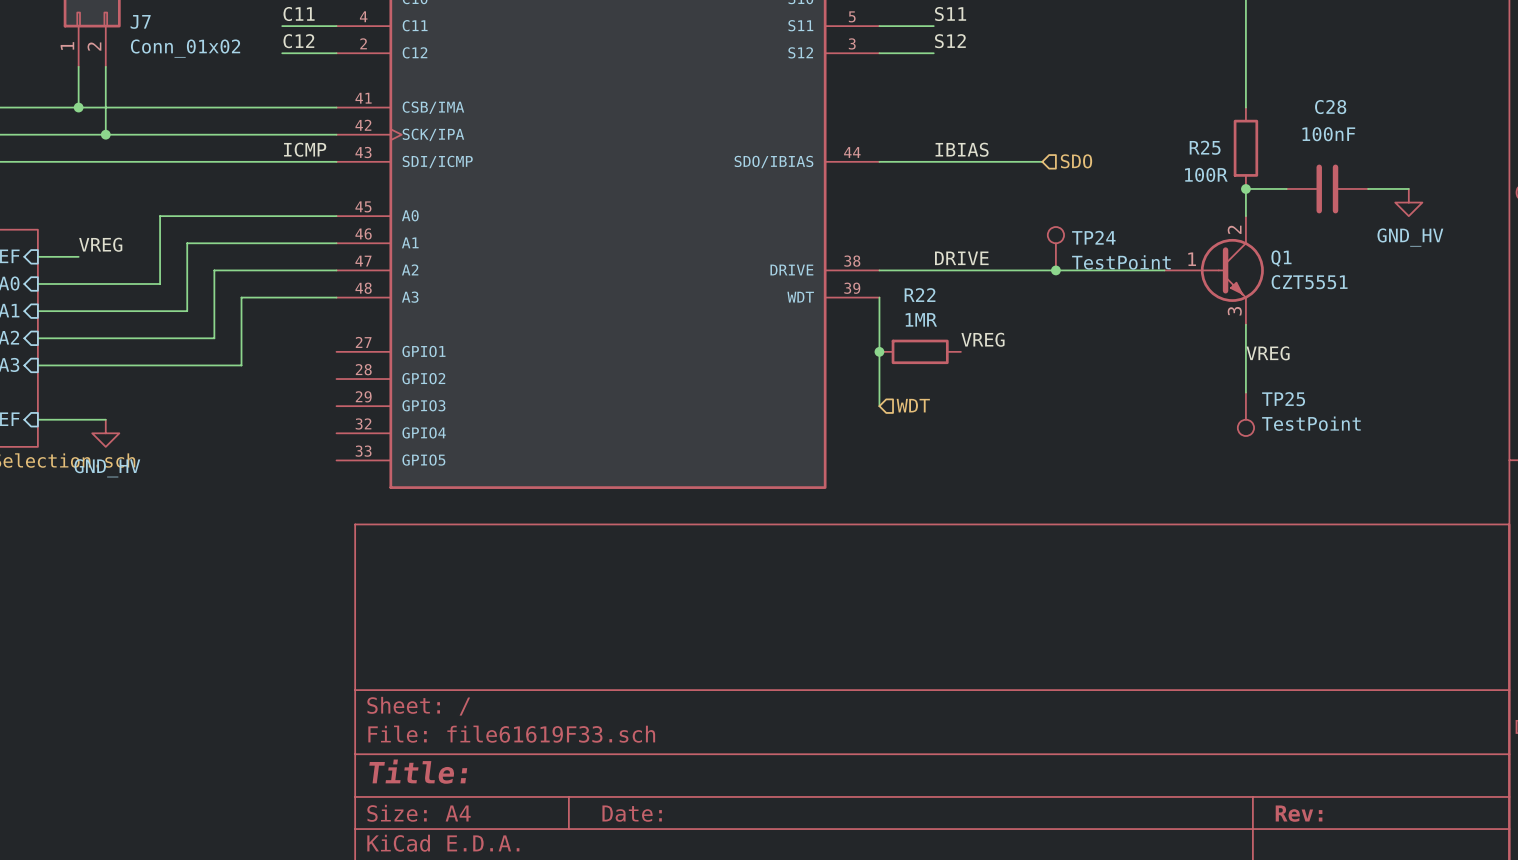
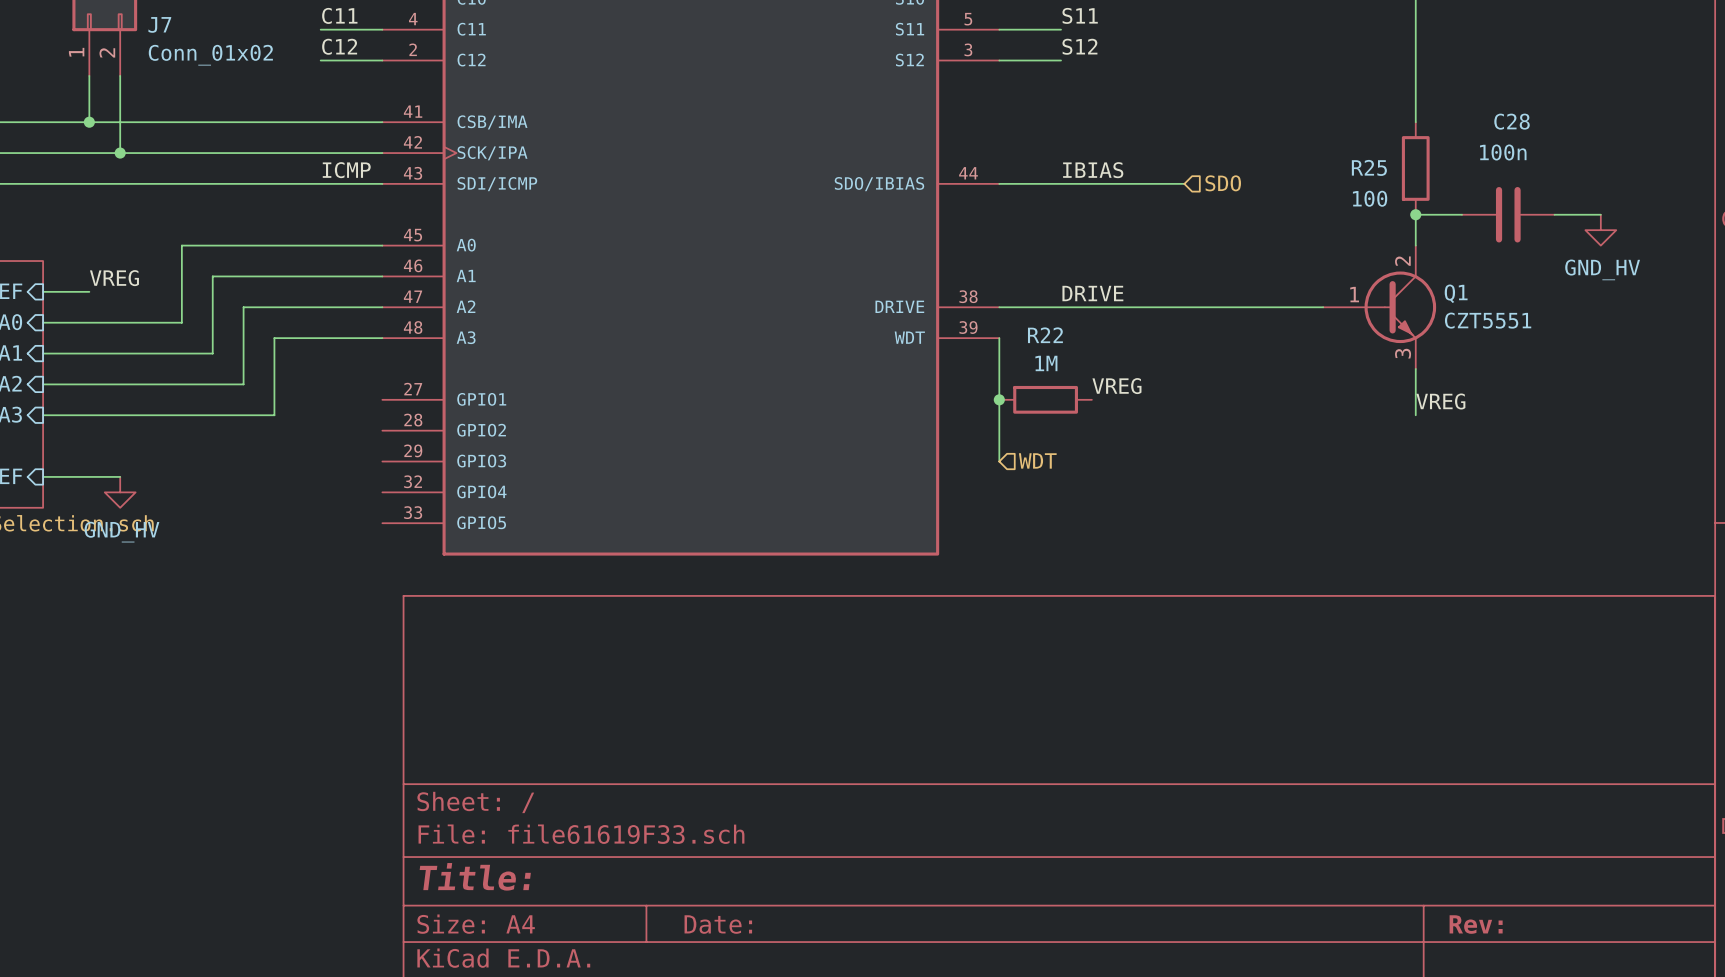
C28 value: 100nF (1328, 134) -> 100n (1503, 152)
R25 value: 100R (1206, 174) -> 100 (1370, 198)
TP24: TestPoint (1055, 248) -> none
junction: (1055, 270) -> none
R22 value: 1MR (921, 319) -> 1M (1046, 363)
wire: (1245, 365) (1245, 392) -> none
TP25: TestPoint (1245, 414) -> none

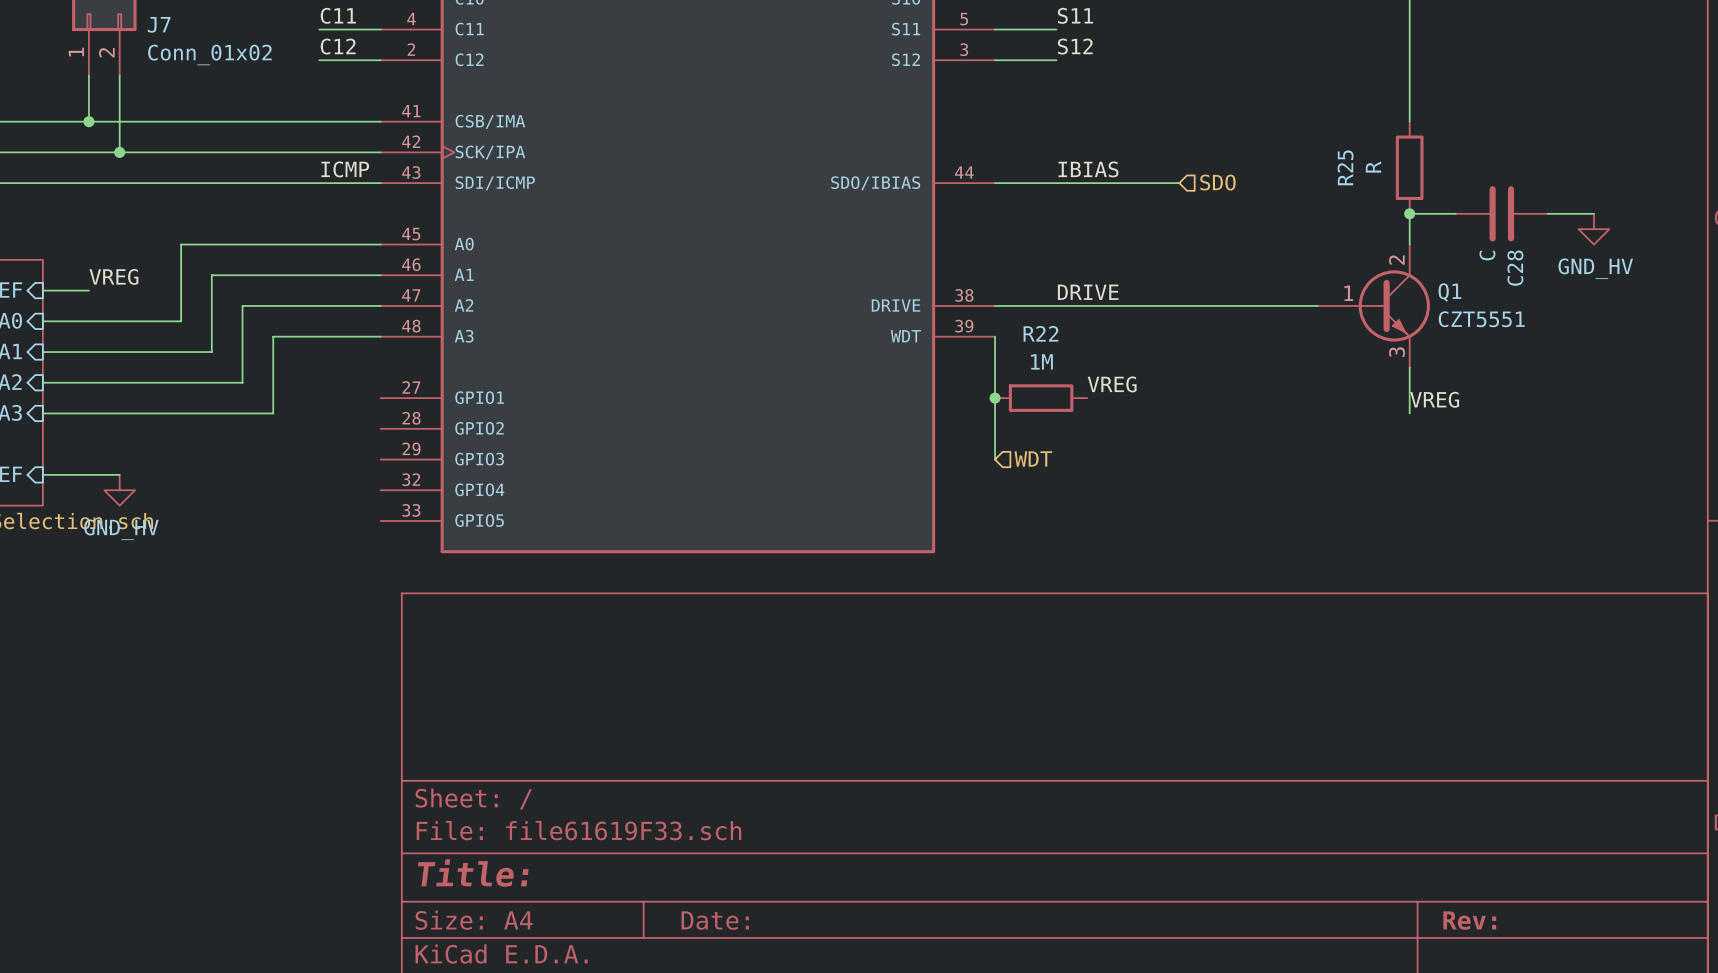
C28 name rotation: 0° (1512, 121) -> 90° counterclockwise (1515, 268)
C28 name position: C28 (1512, 121) -> C28 (1515, 268)
C28 value: 100n (1503, 152) -> C (1487, 255)
R25 name rotation: 0° (1369, 167) -> 90° counterclockwise (1345, 167)
R25 value: 100 (1370, 198) -> R (1373, 167)

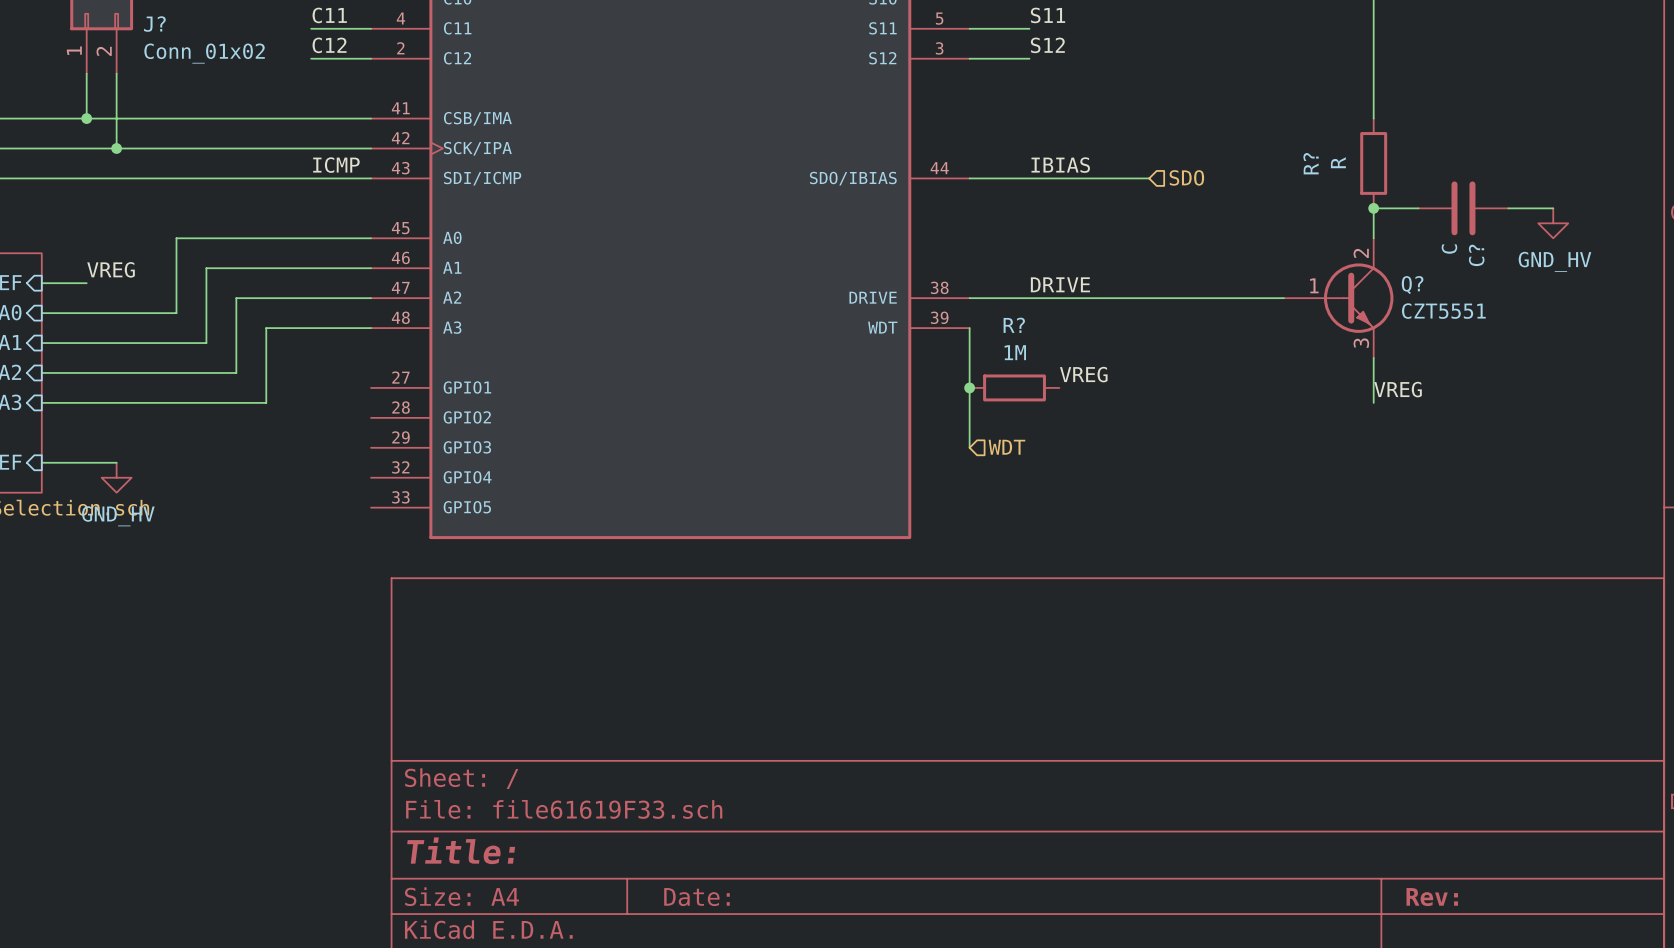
J7 name: J7 (159, 24) -> J? (154, 24)
R25 name: R25 (1345, 167) -> R? (1311, 163)
C28 name: C28 (1515, 268) -> C? (1476, 255)
Q1 name: Q1 (1449, 292) -> Q? (1412, 285)
R22 name: R22 (1040, 333) -> R? (1014, 325)

